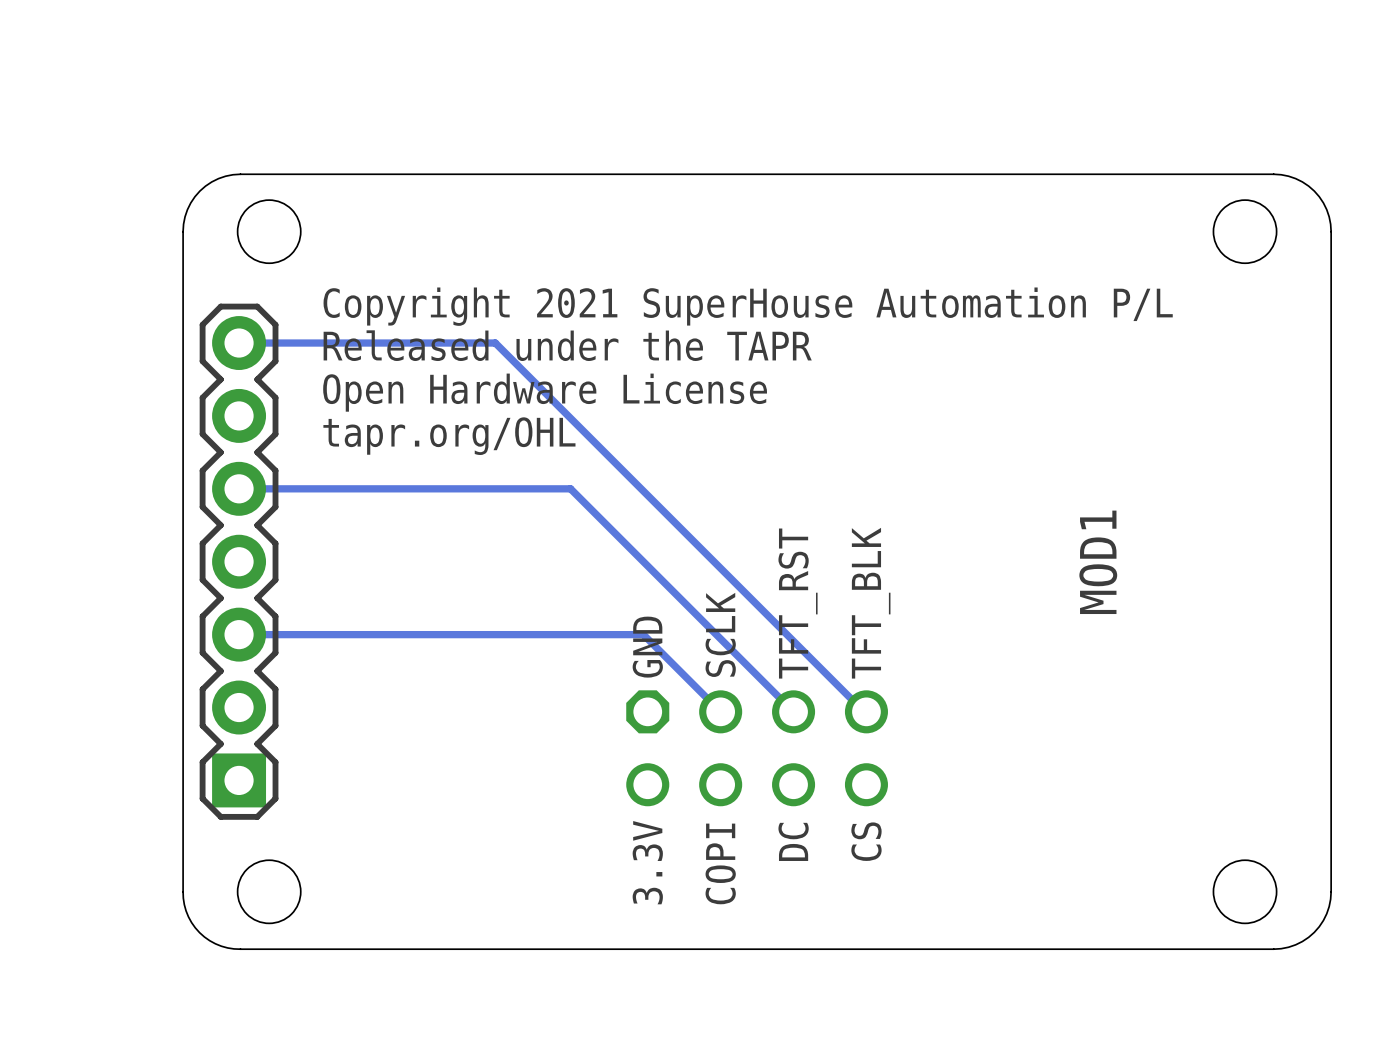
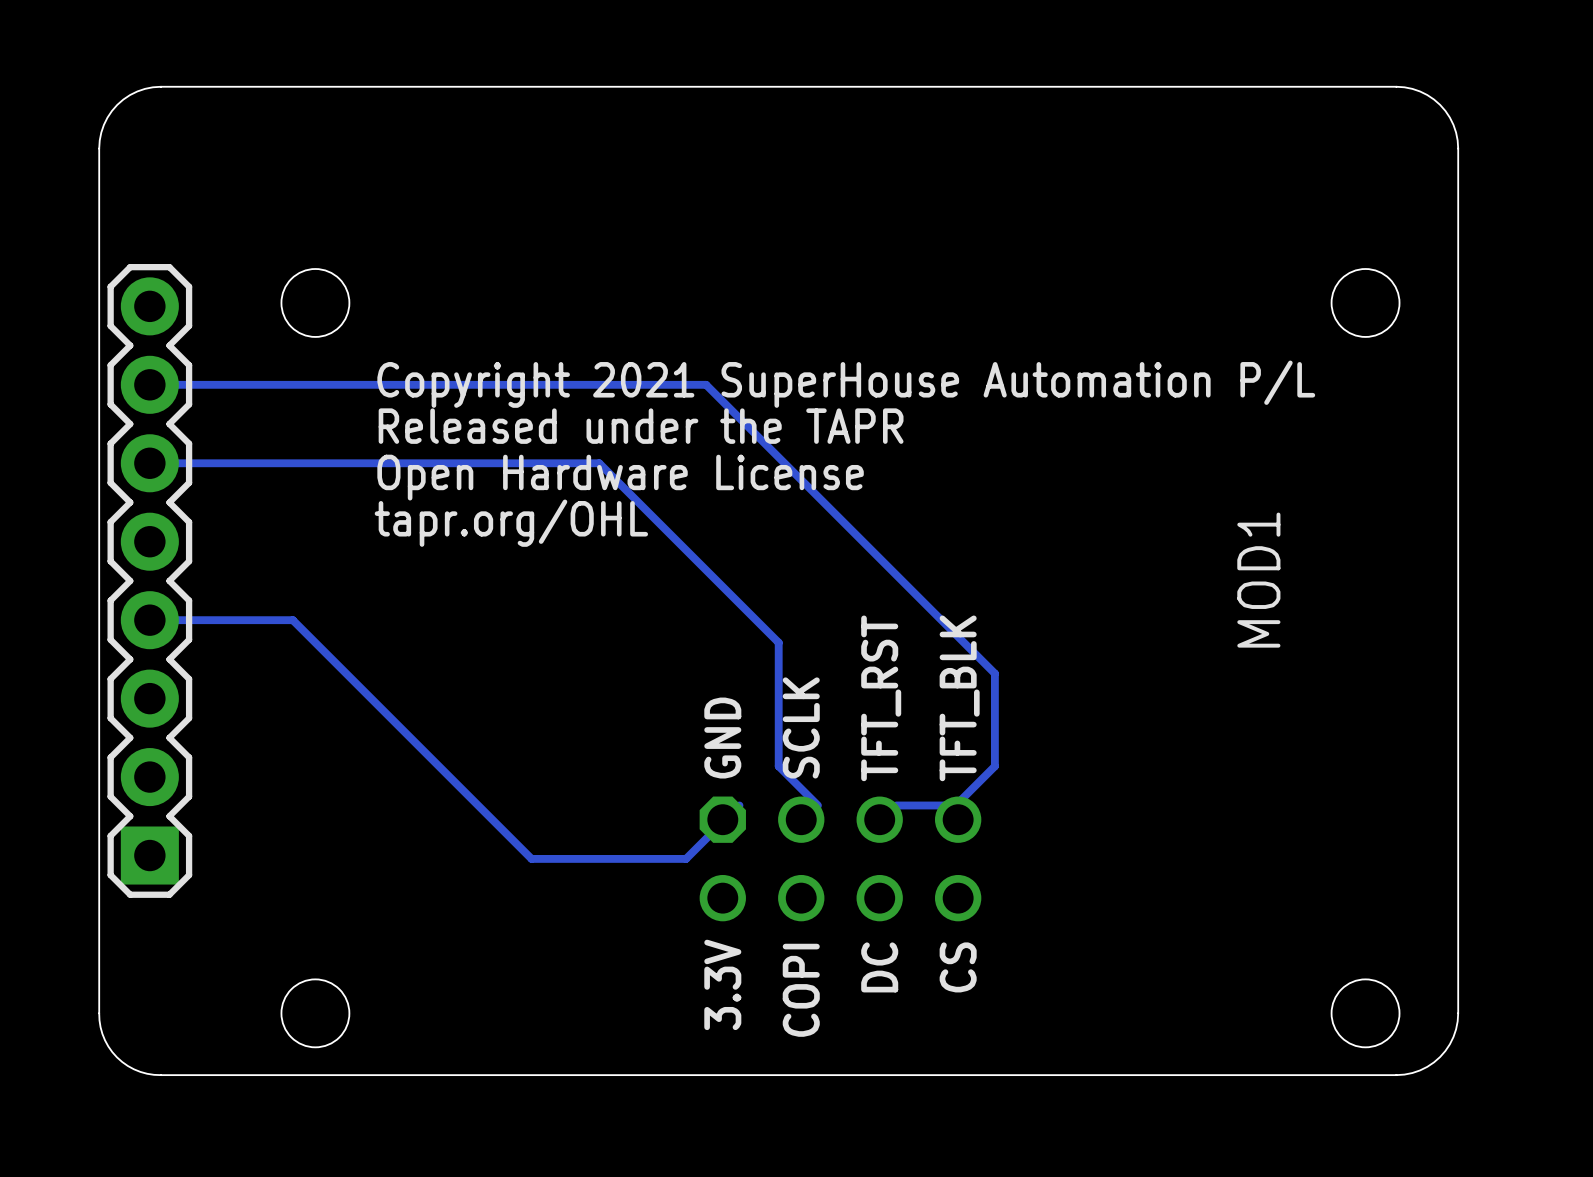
board edge: (1331, 231) (1326, 209) (1314, 191) (1295, 178) (1273, 174) (240, 174) (225, 176) (211, 181) (199, 191) (190, 202) (185, 216) (183, 231) (183, 891) (186, 910) (199, 932) (221, 946) (240, 949) -> (1458, 302) (1458, 148) (1456, 132) (1449, 117) (1440, 104) (1427, 95) (1404, 87) (160, 86) (144, 88) (130, 95) (117, 104) (107, 117) (101, 132) (99, 148) (100, 1027) (108, 1046) (116, 1057) (127, 1065) (147, 1073) (284, 1075)
MOD1 footprint: [199, 303, 279, 820] -> [107, 264, 193, 898]
track: none -> (149, 384) (706, 384) (994, 673) (994, 766) (955, 805) (896, 805)
track: (239, 343) (495, 343) (532, 380) -> (149, 463) (599, 463)
track: (239, 488) (570, 488) (793, 711) -> none
track: none -> (149, 620) (292, 620) (531, 858) (686, 858) (739, 805)
track: (699, 547) (864, 711) (866, 711) -> (778, 642) (778, 766) (817, 805)
MOD1 name position: MOD1 (1098, 562) -> MOD1 (1258, 580)
track: (239, 634) (643, 634) (720, 711) -> none

